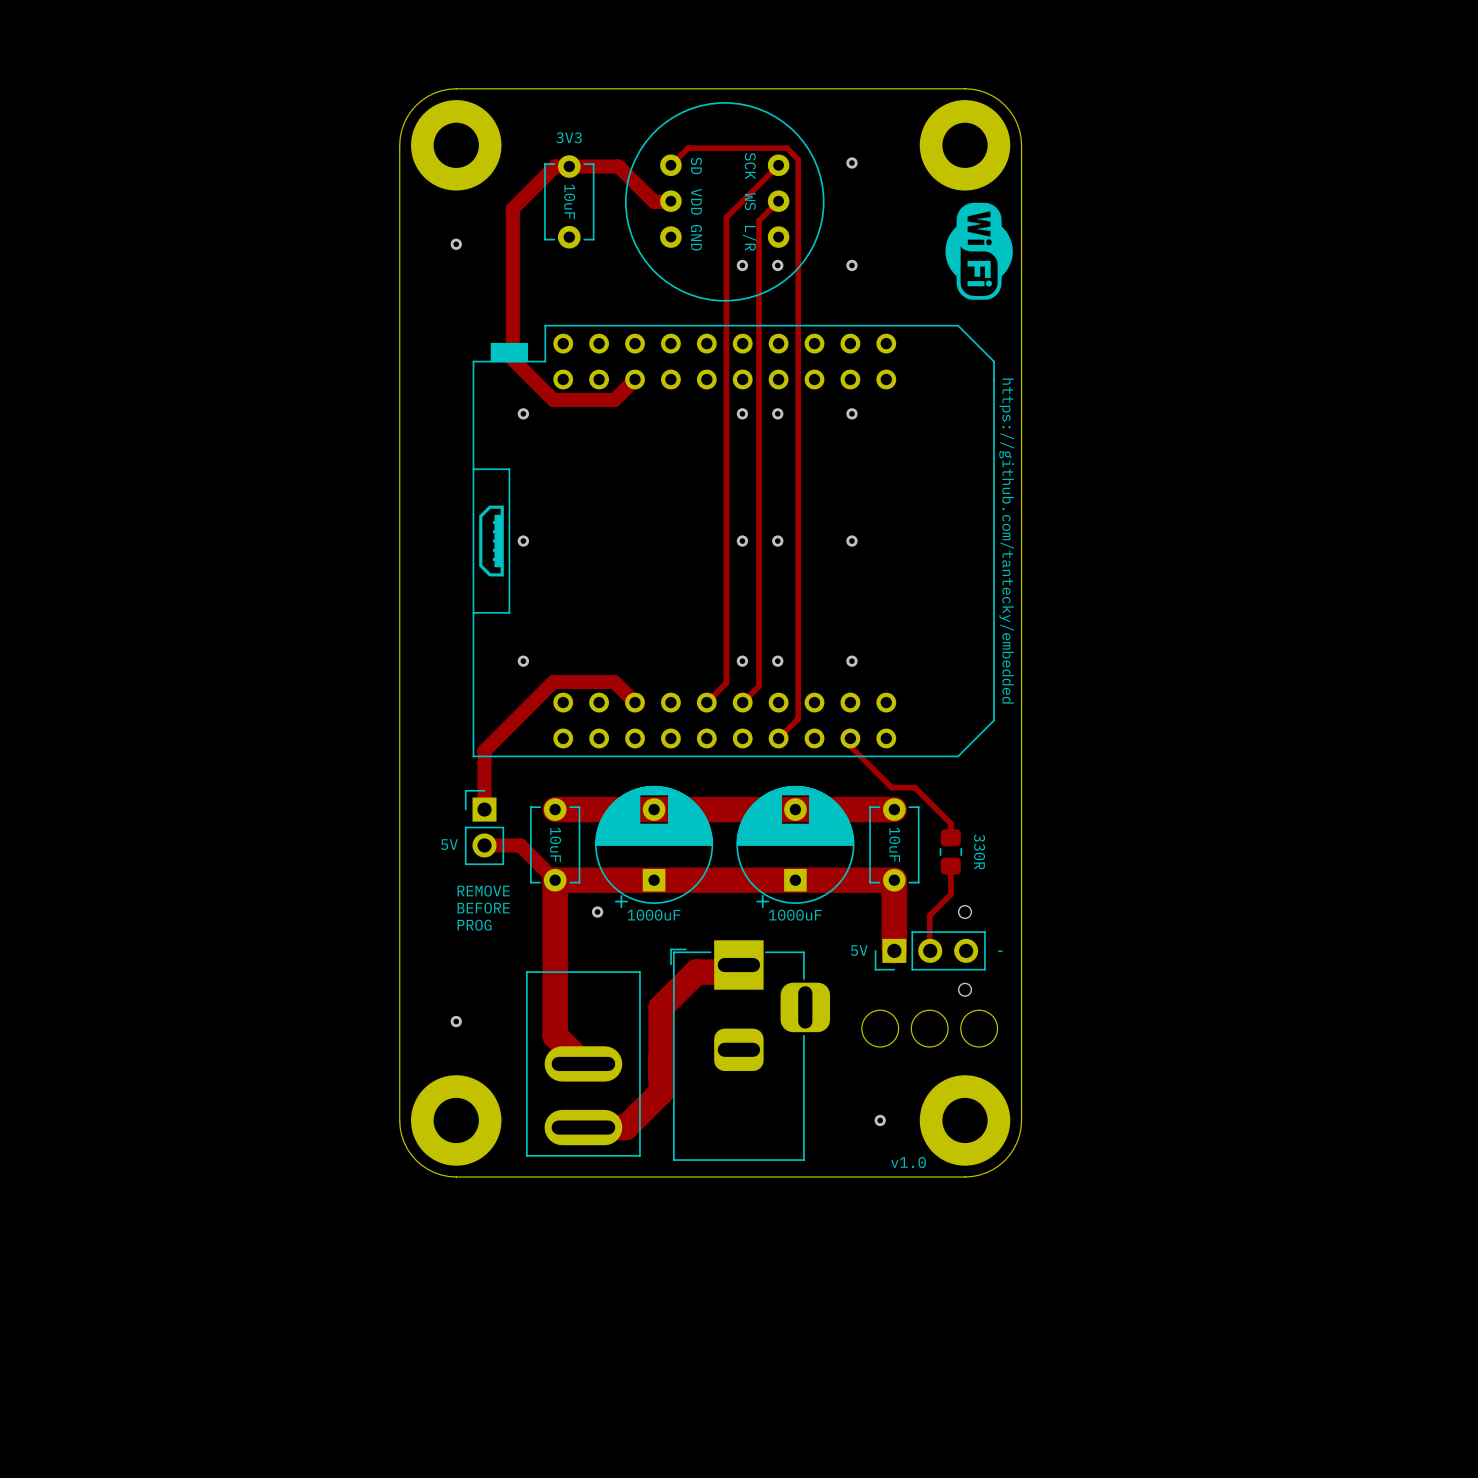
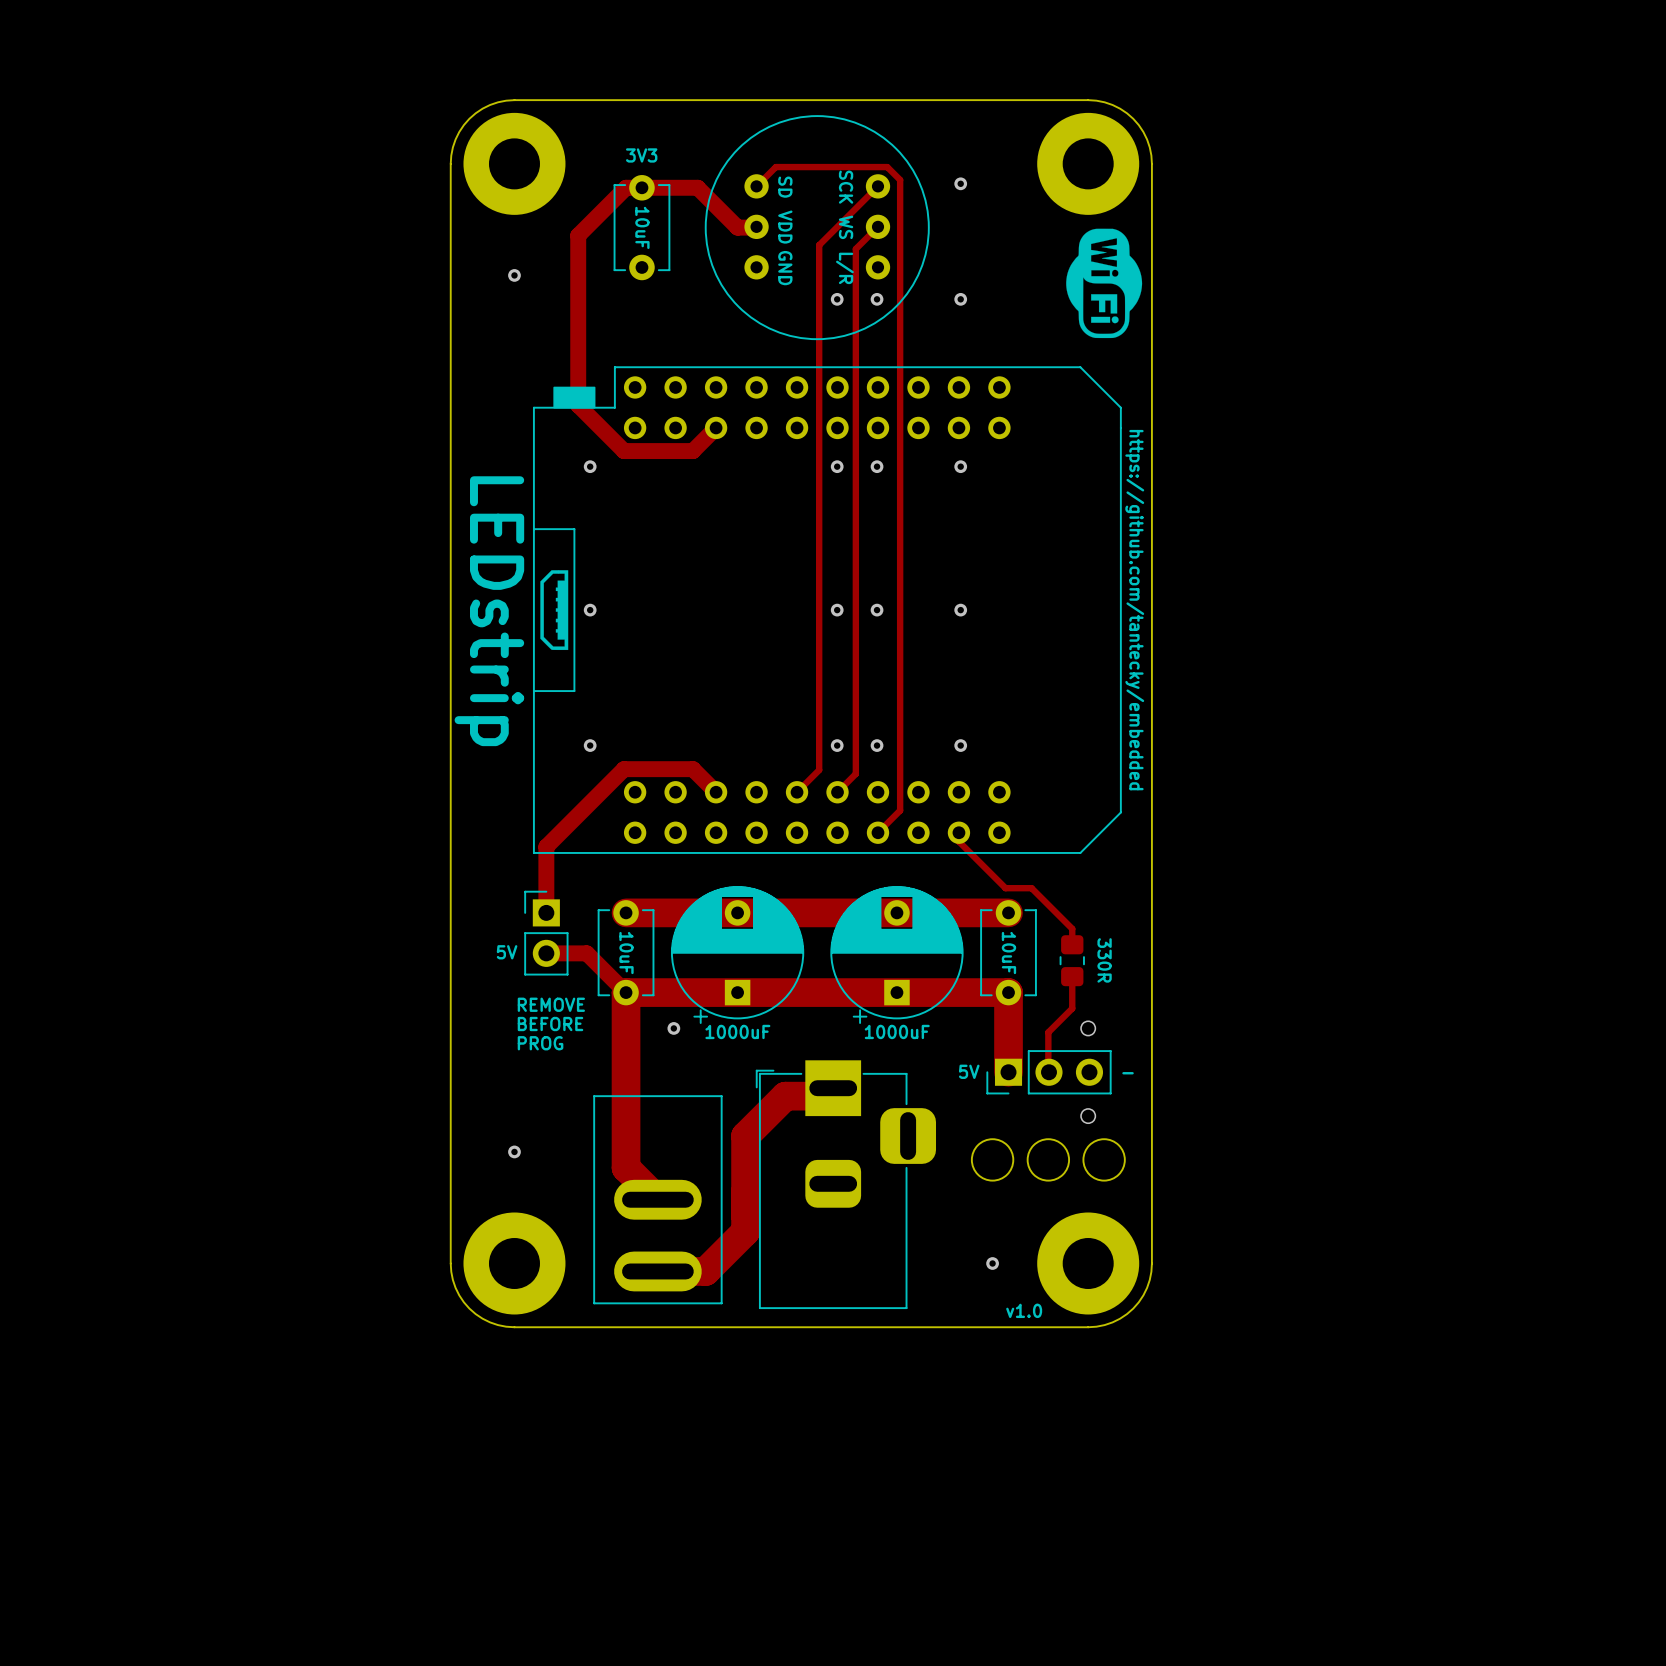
text: none -> LEDstrip (489, 611)

